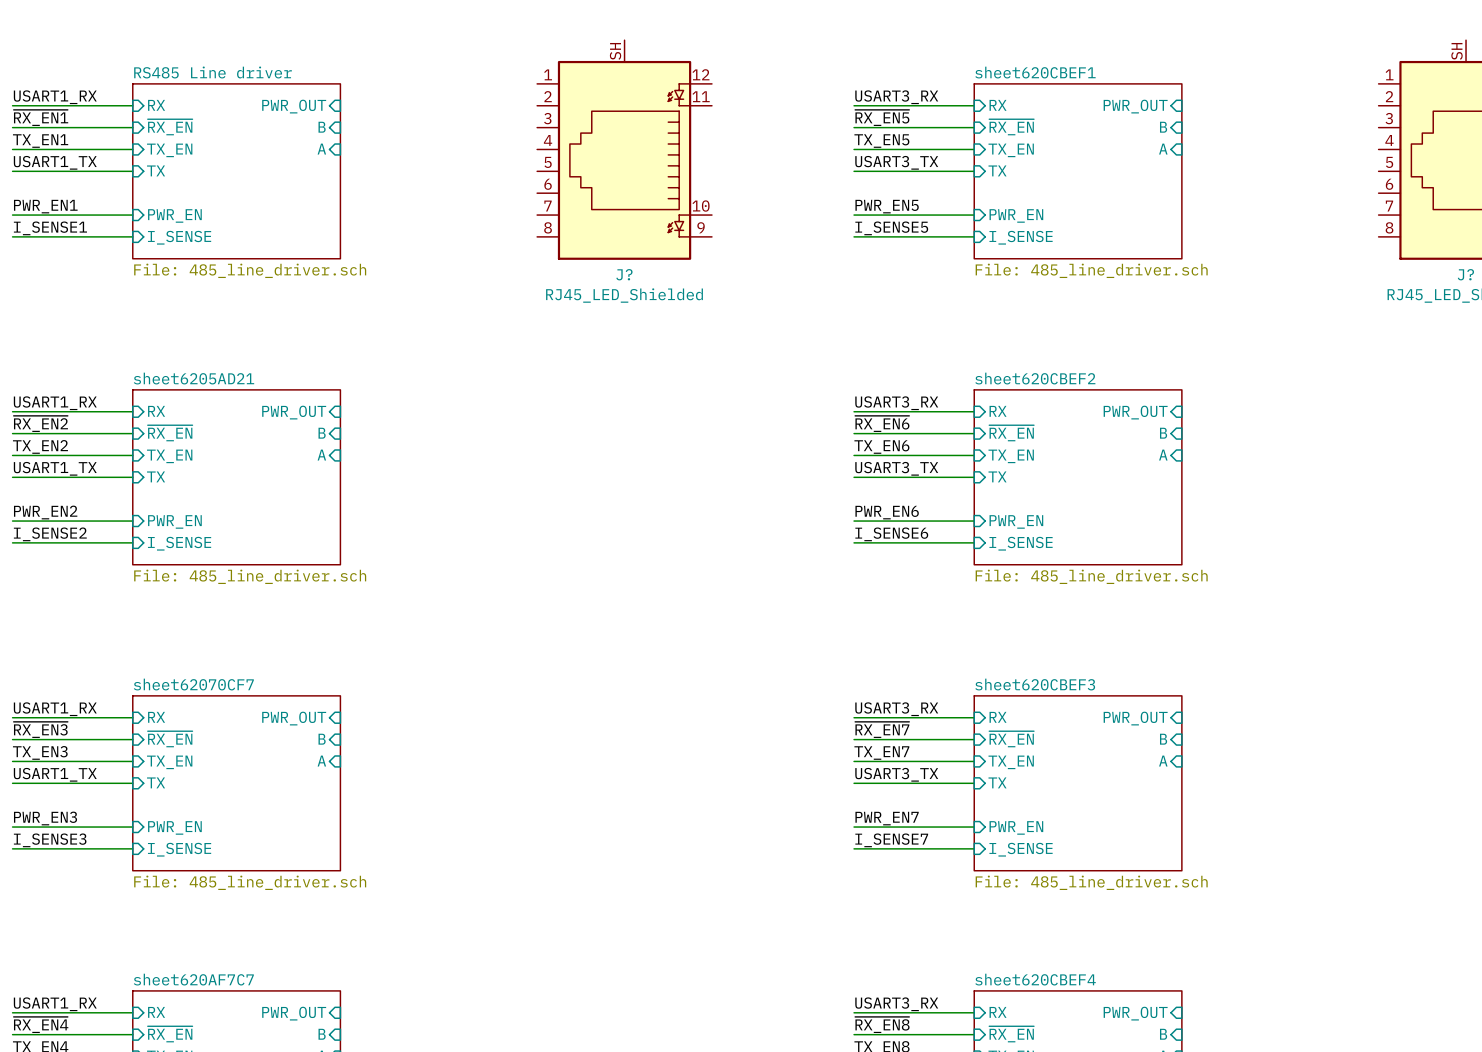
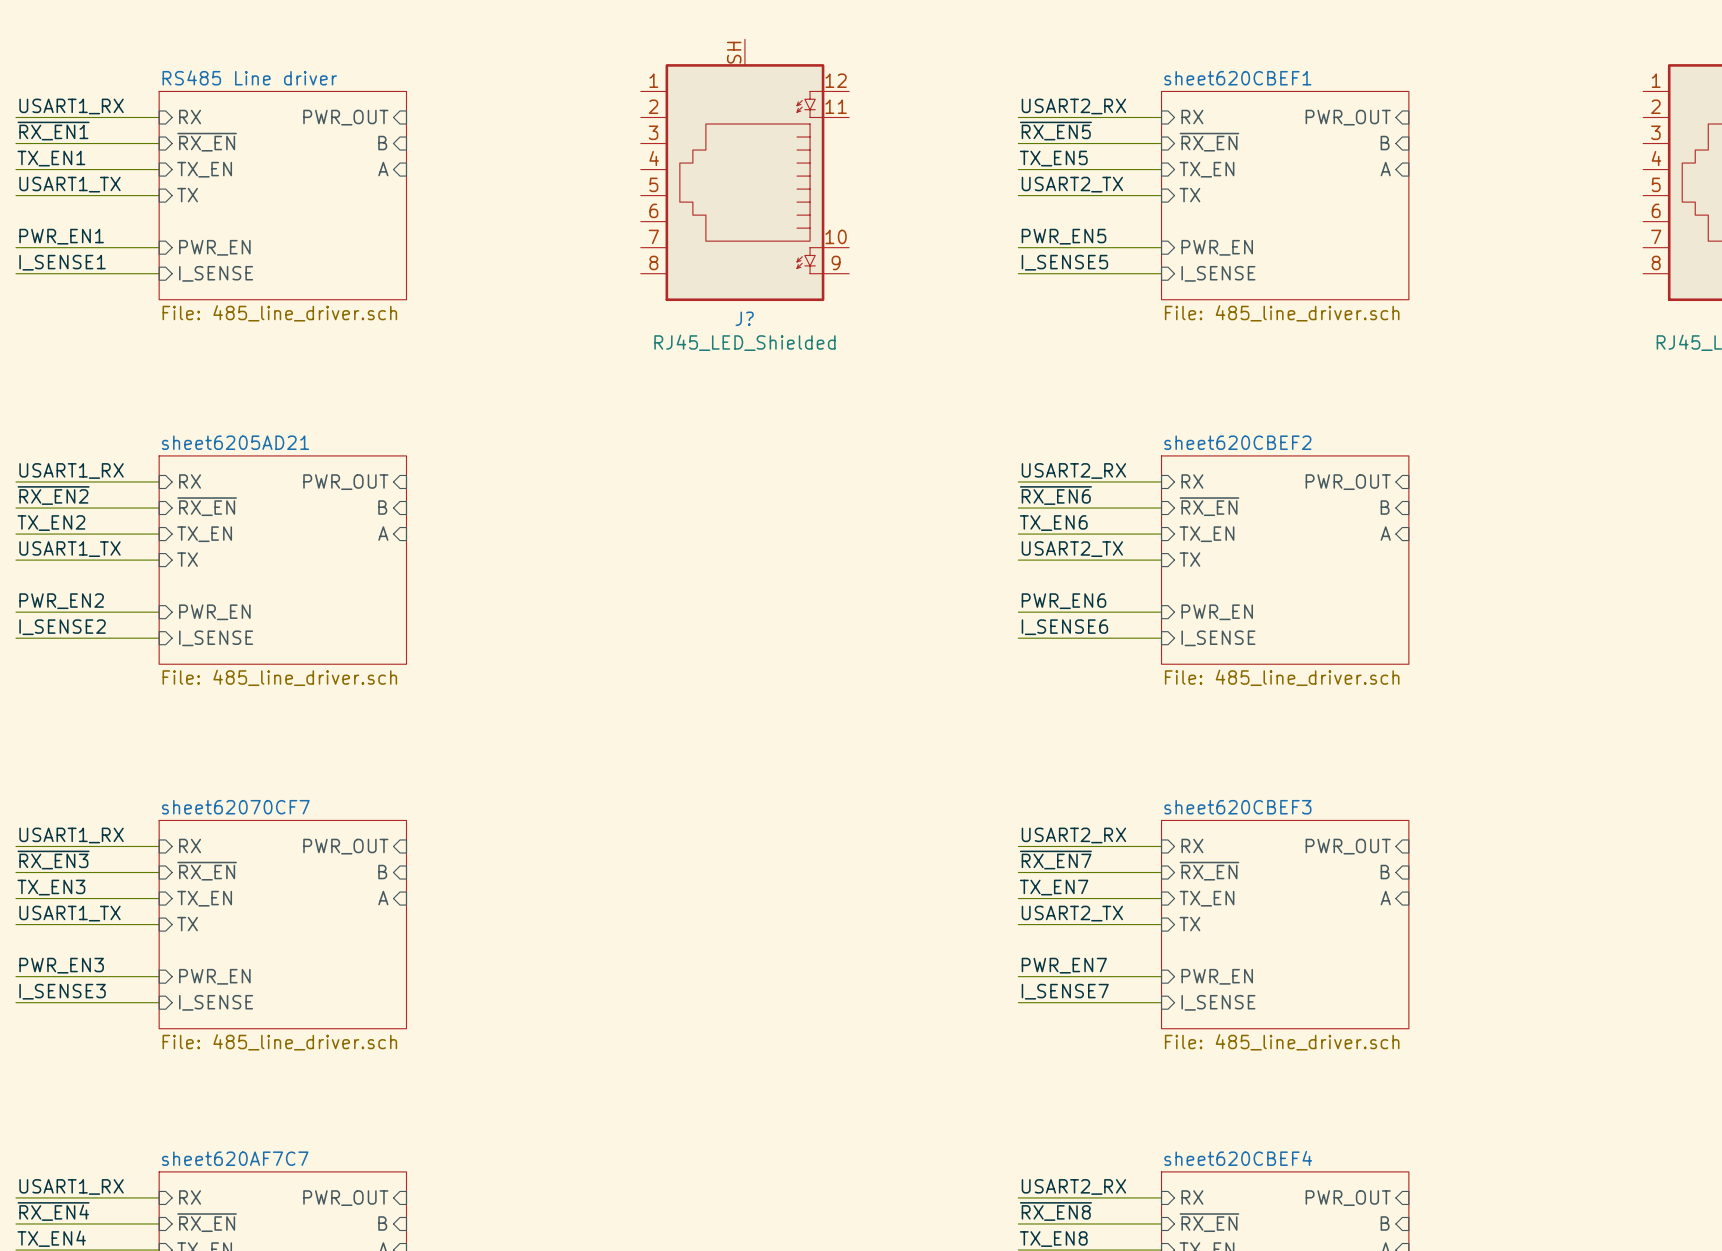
label: USART3_RX (896, 97) -> USART2_RX (1073, 106)
label: USART3_TX (896, 162) -> USART2_TX (1072, 184)
label: USART3_RX (896, 403) -> USART2_RX (1073, 470)
label: USART3_TX (896, 468) -> USART2_TX (1072, 549)
label: USART3_RX (896, 709) -> USART2_RX (1073, 835)
label: USART3_TX (896, 774) -> USART2_TX (1072, 913)
label: USART3_RX (896, 1004) -> USART2_RX (1073, 1186)

